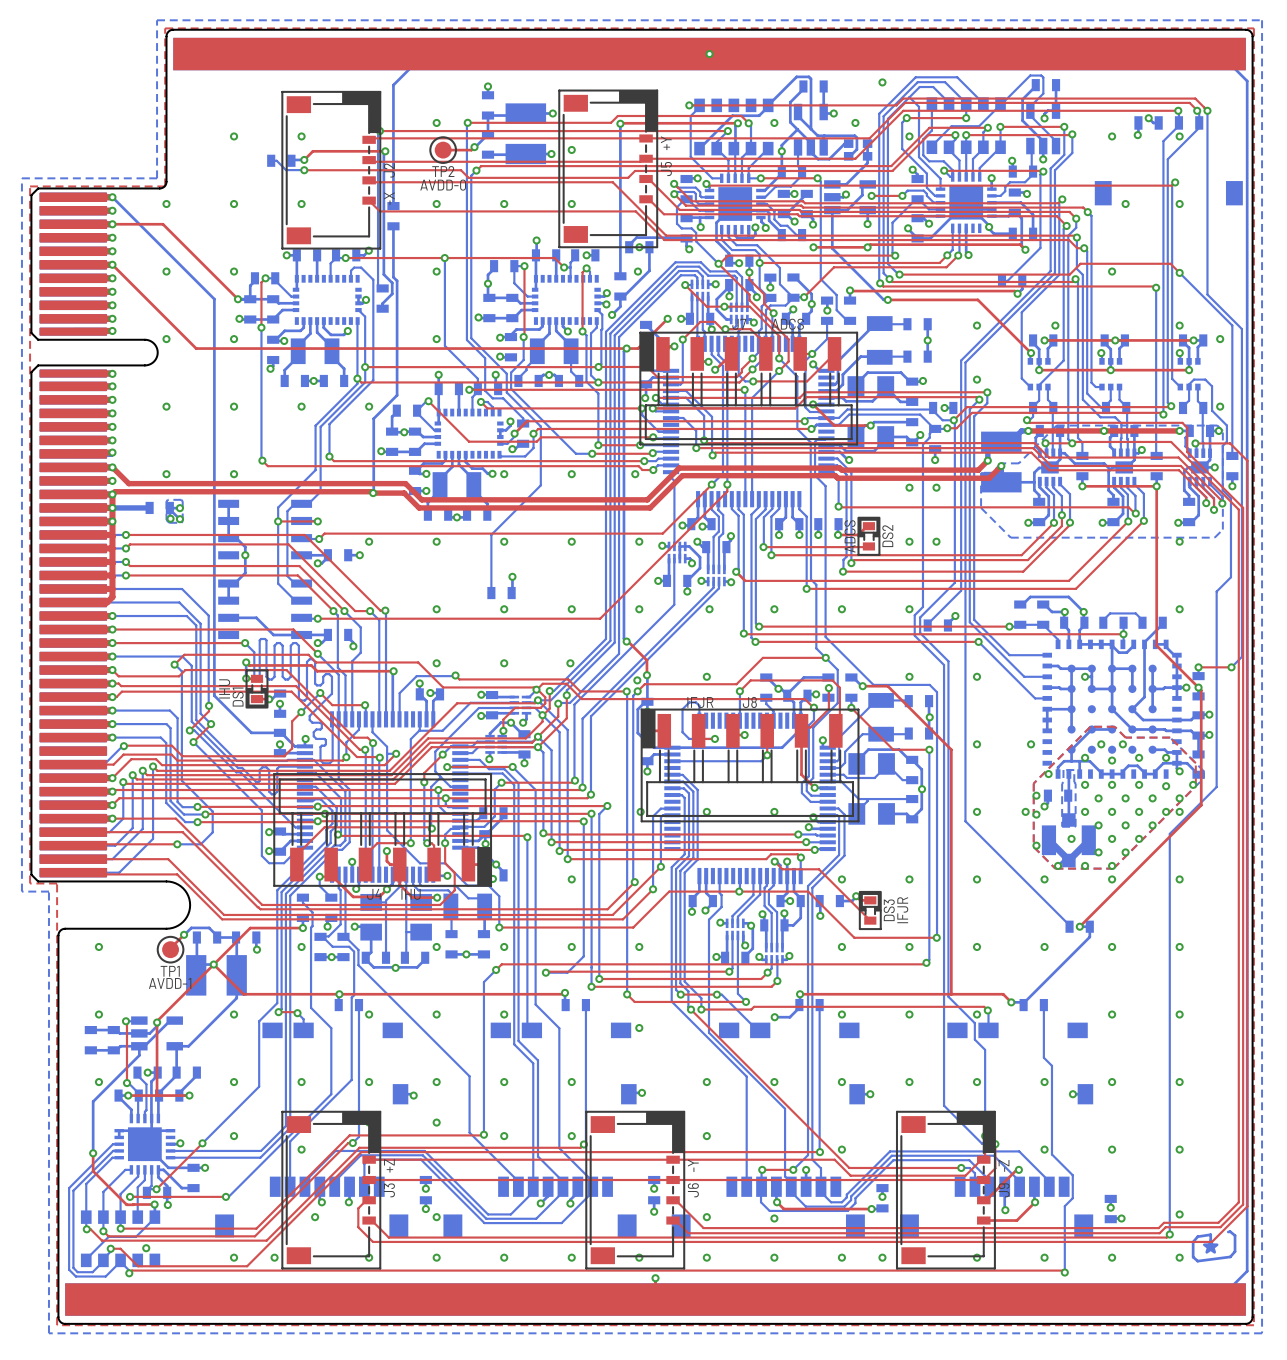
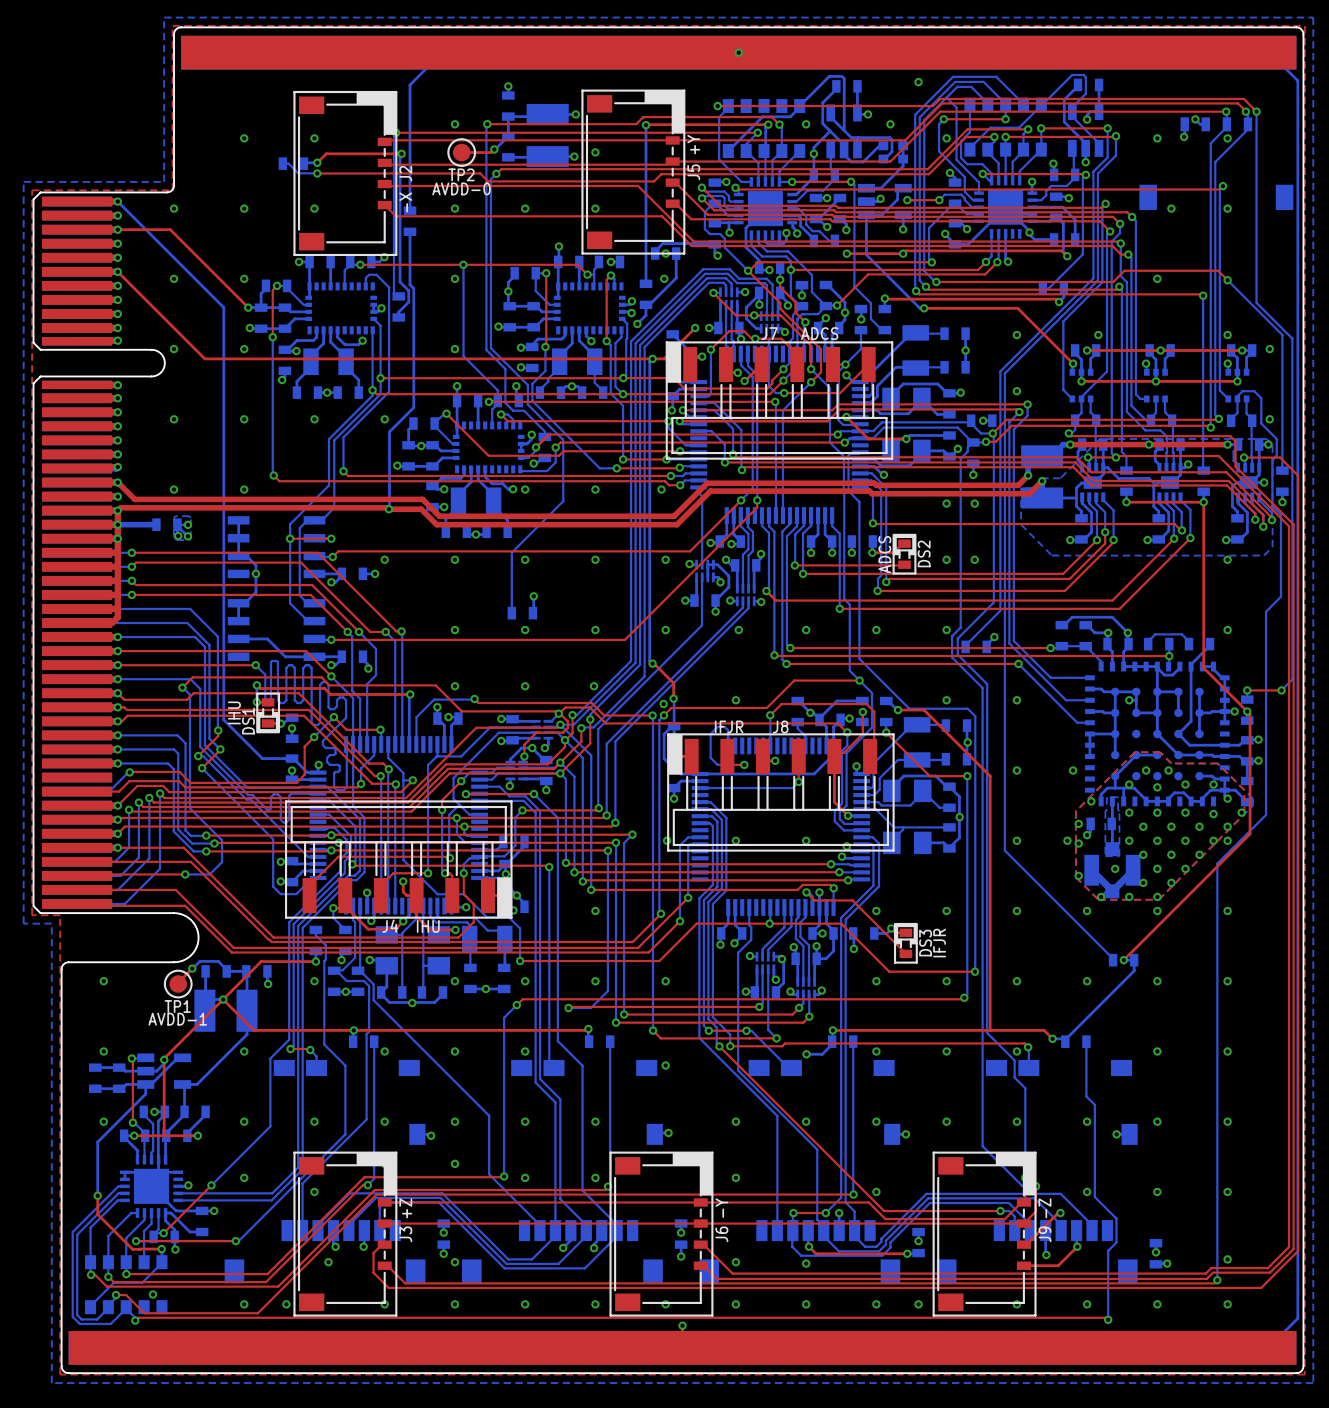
drawing: [1191, 1230, 1237, 1263] -> none

